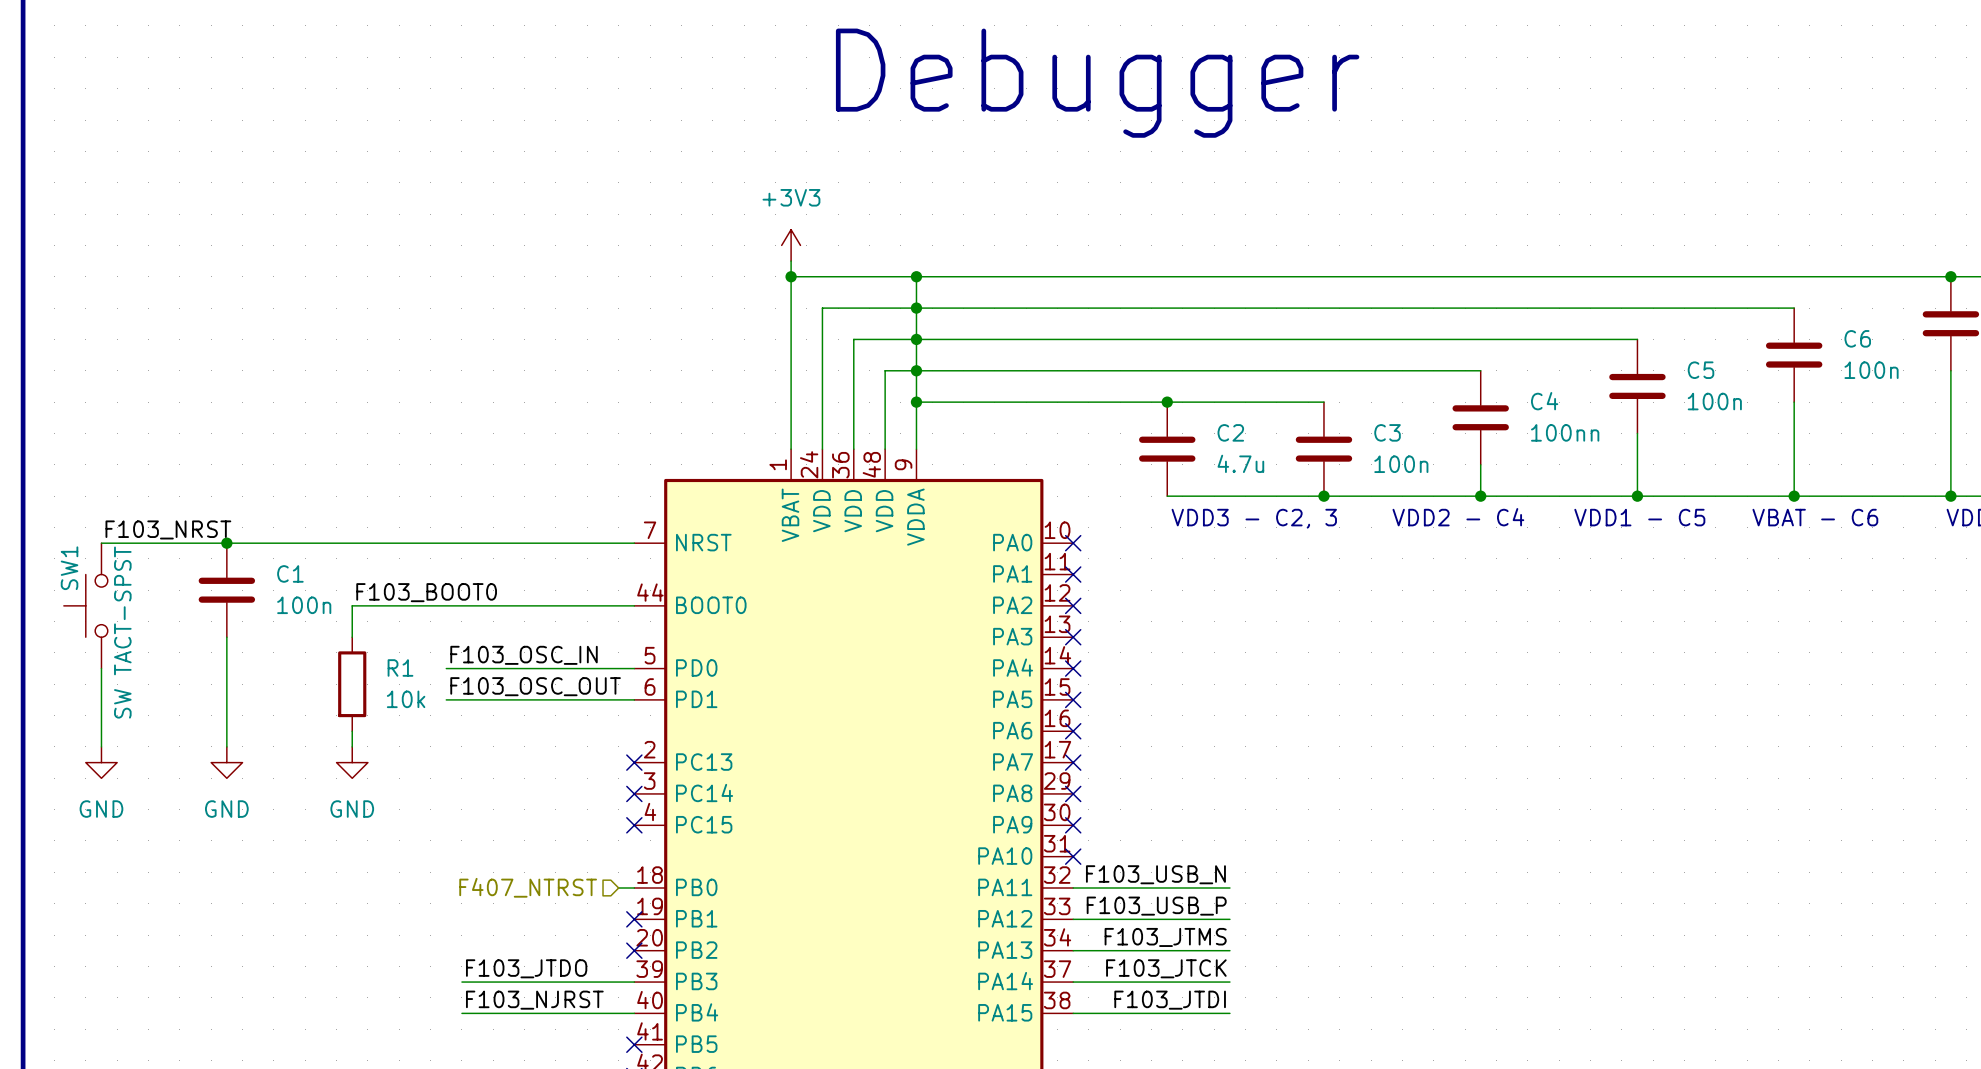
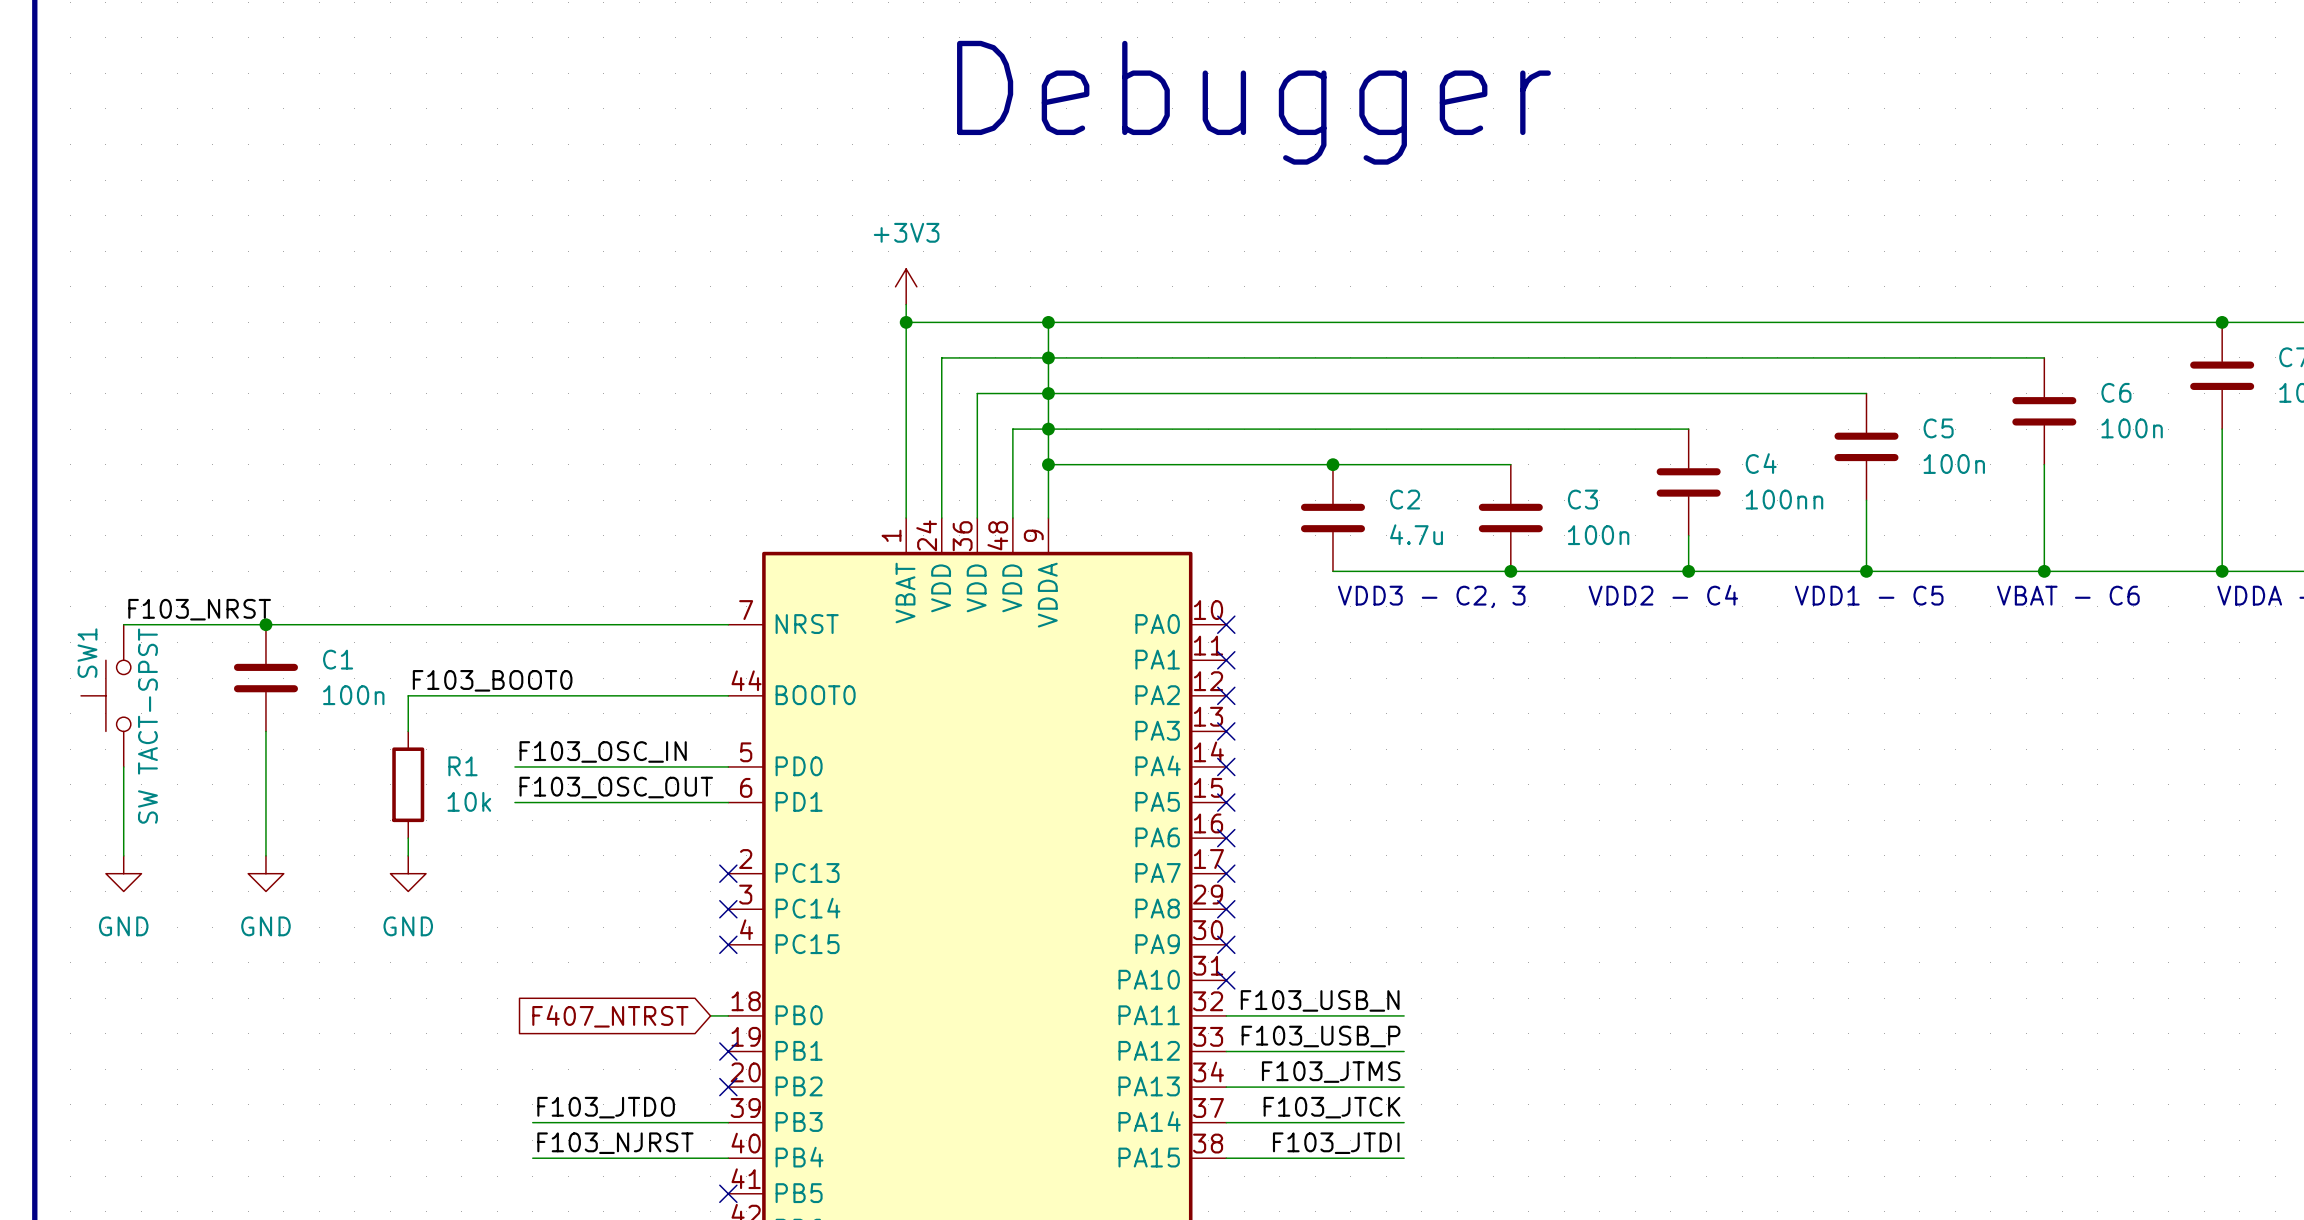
hierarchical label: F407_NTRST (528, 887) -> none
global label: none -> F407_NTRST (610, 1016)

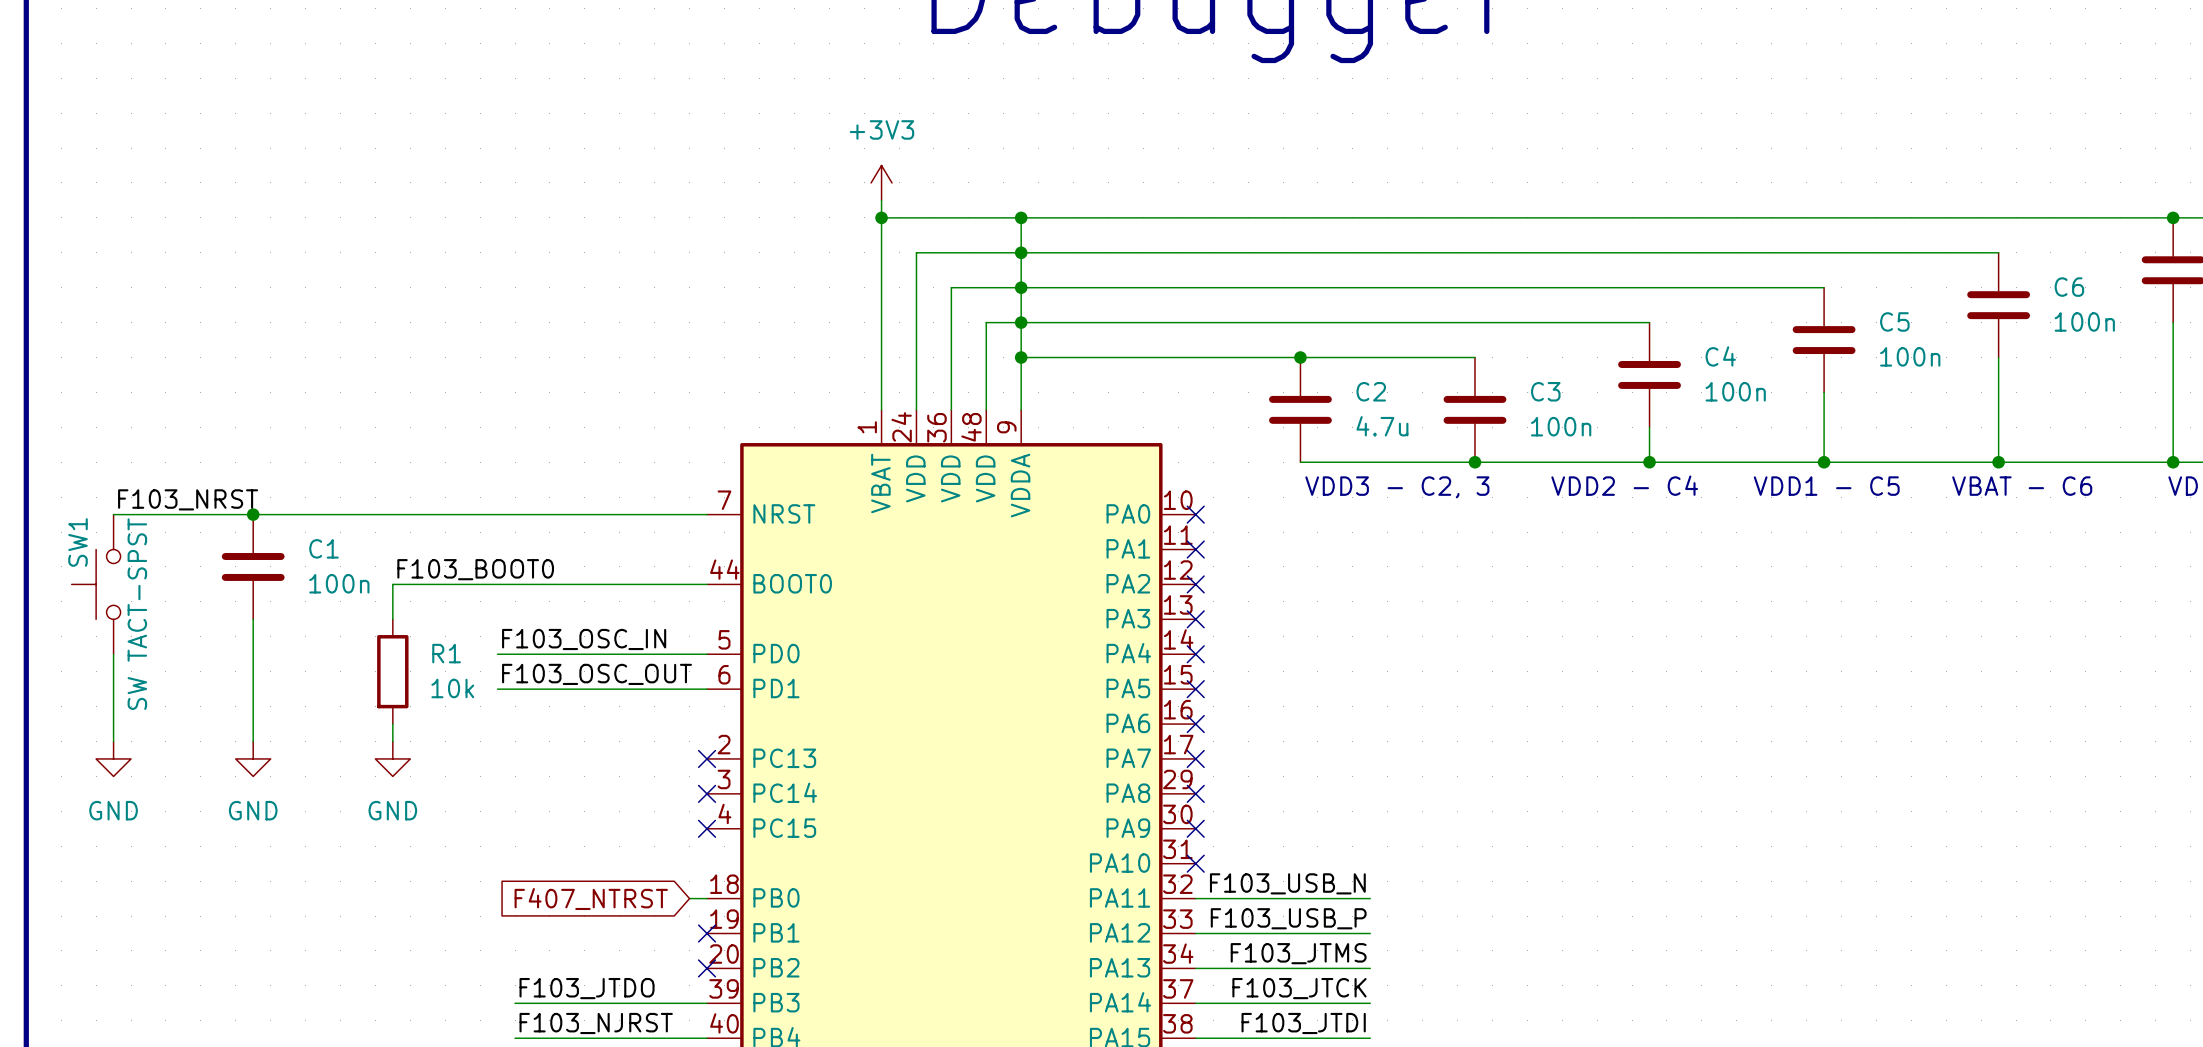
C4 value: 100nn (1784, 499) -> 100n (1735, 391)

